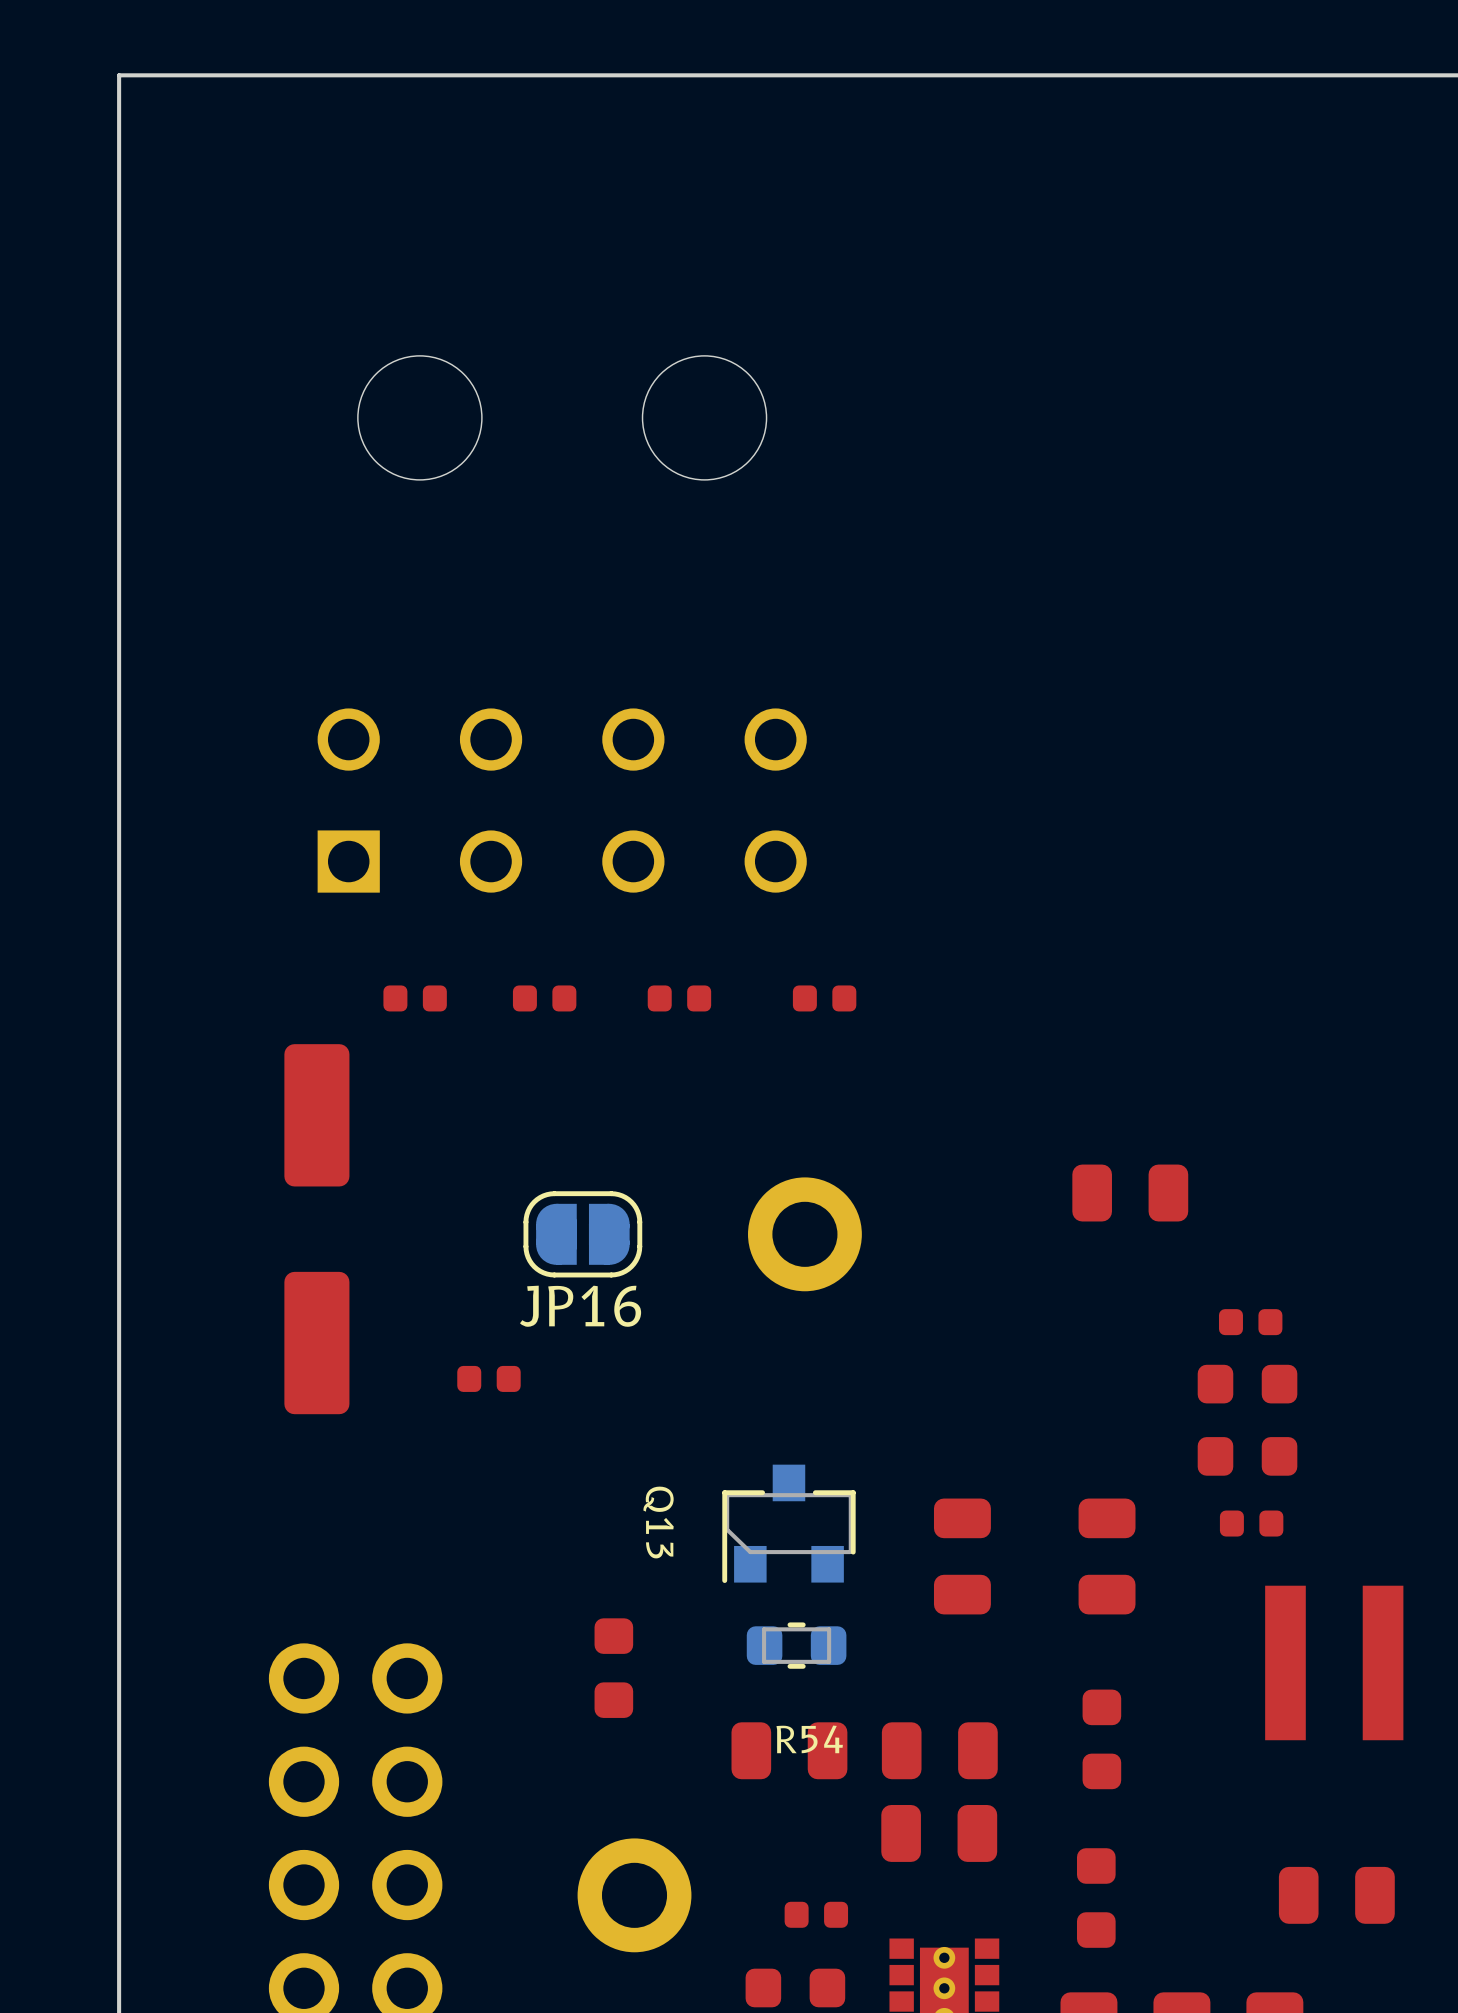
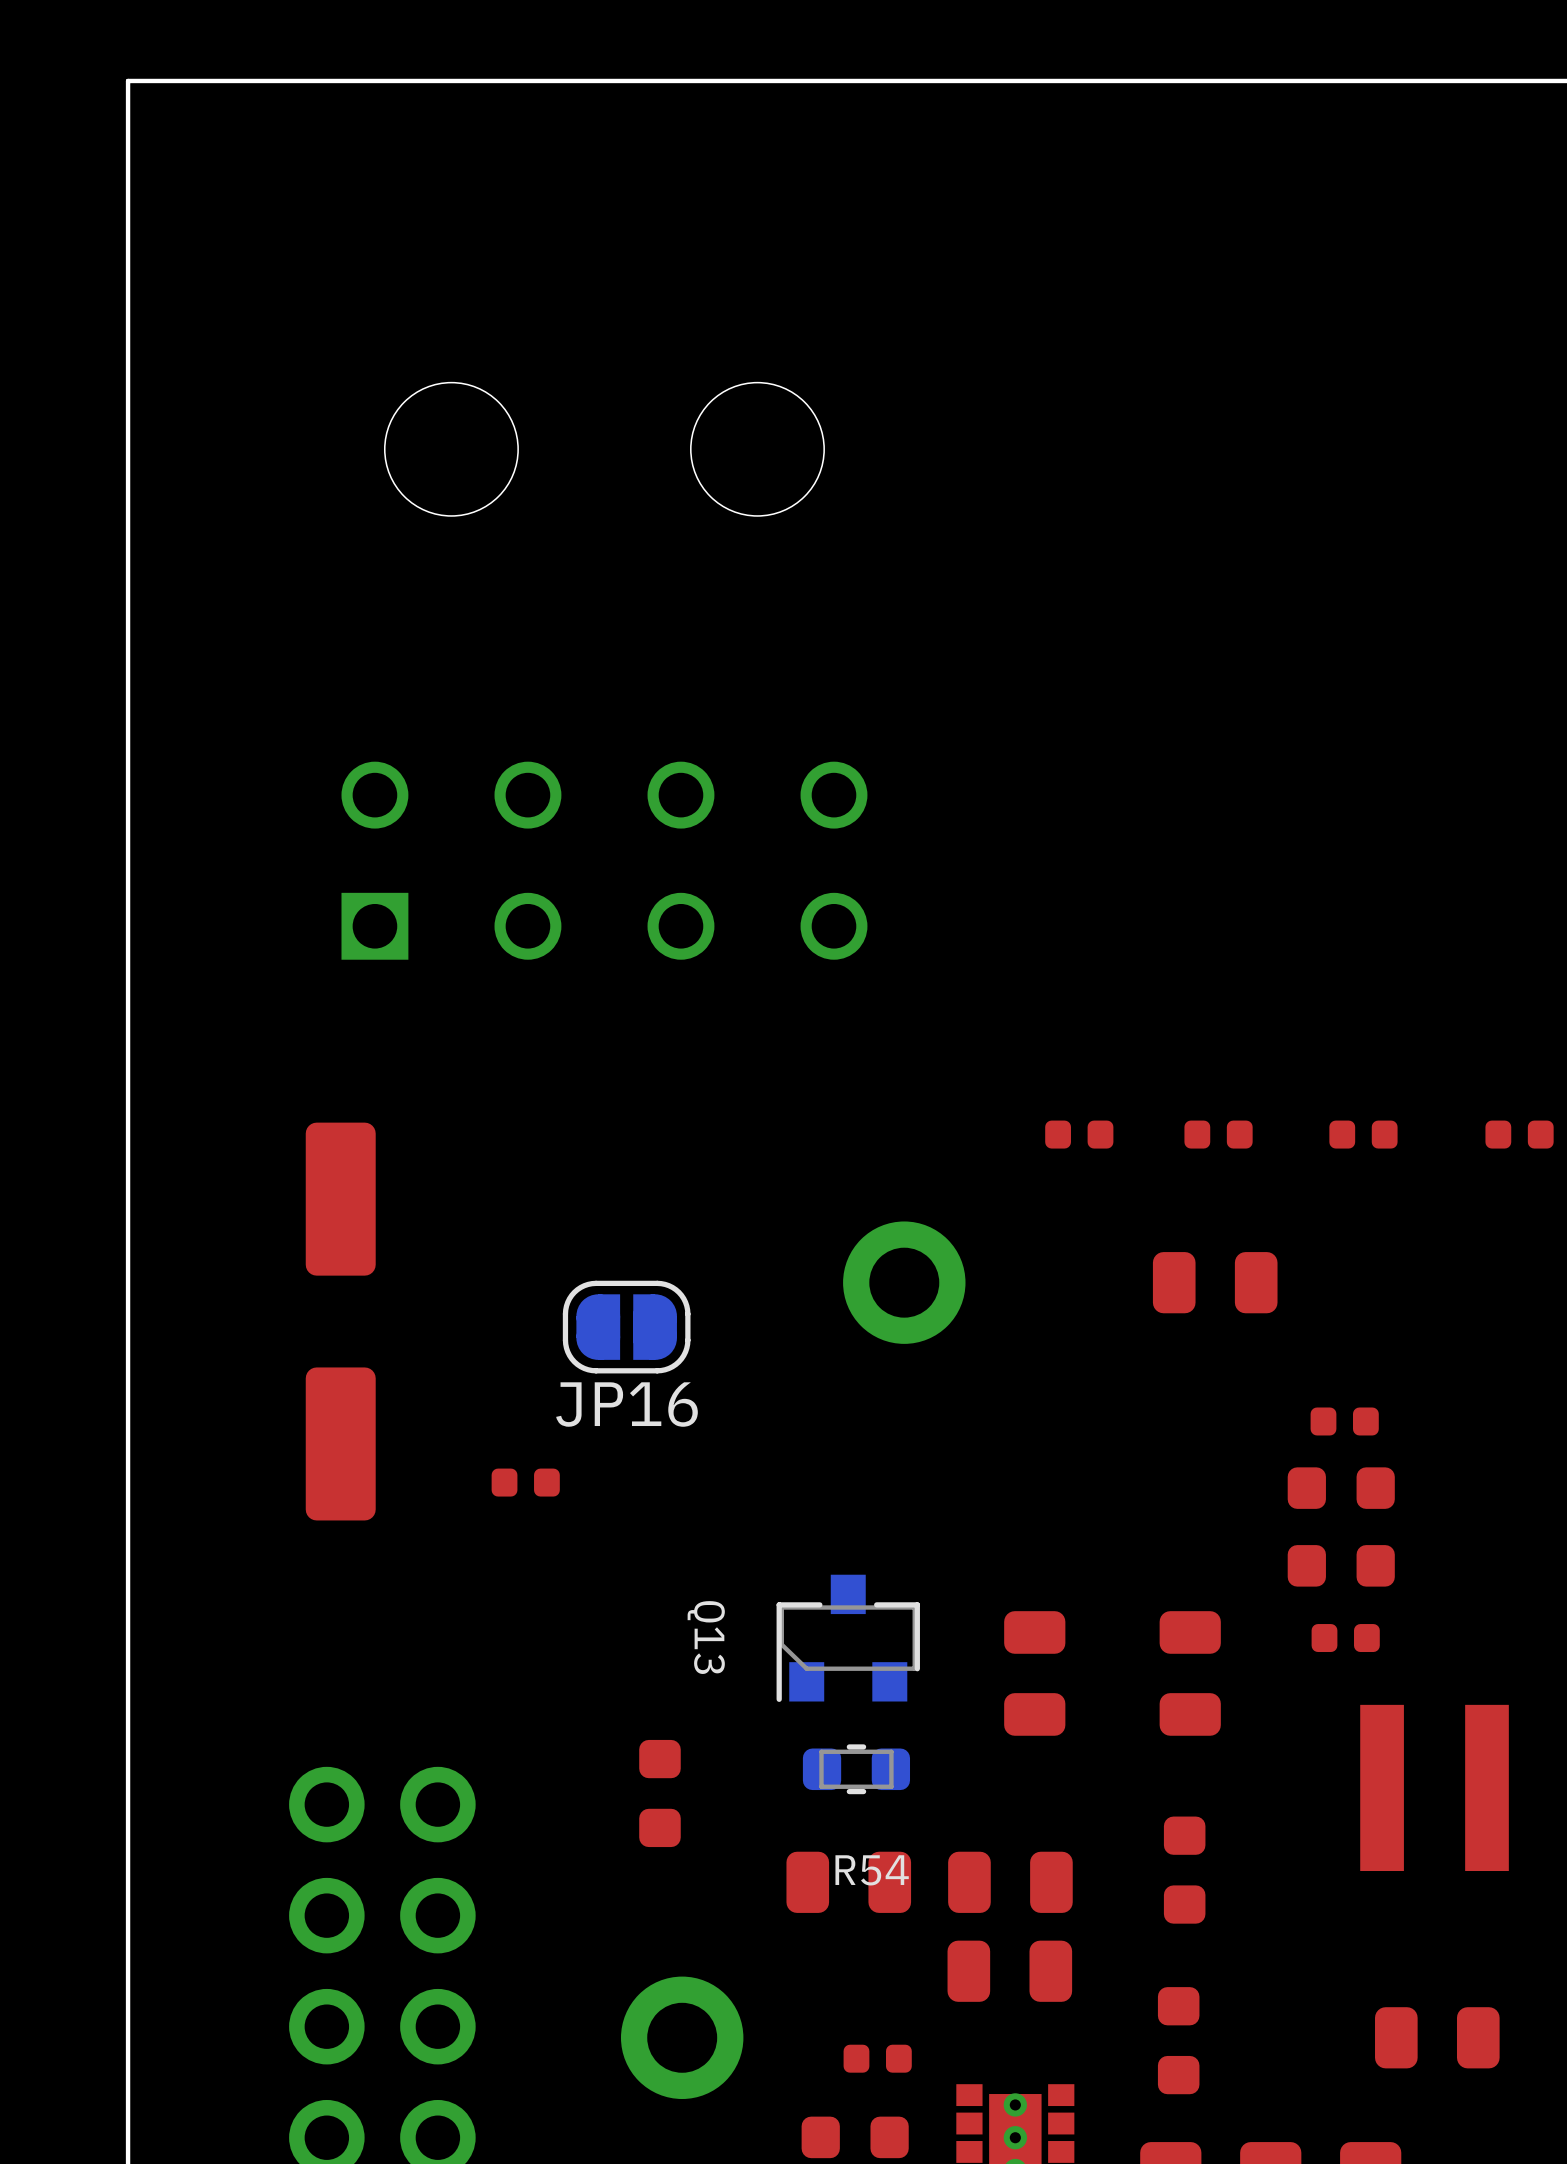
part: (415, 998) -> none
part: (544, 998) -> none
part: (679, 998) -> none
part: (824, 998) -> none
part: none -> (1079, 1134)
part: none -> (1218, 1134)
part: none -> (1363, 1134)
part: none -> (1519, 1134)
part position: (804, 1234) -> (904, 1282)

